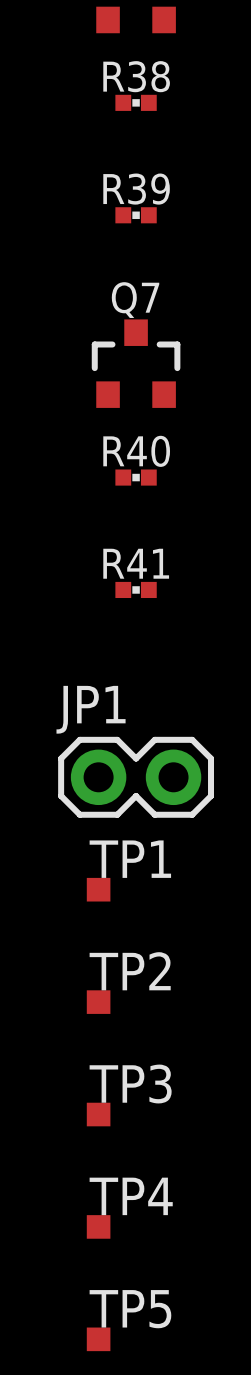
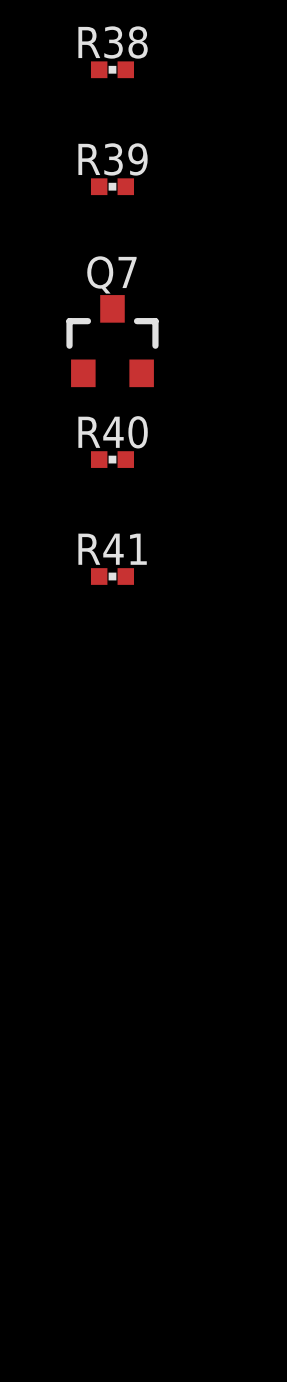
JP1: (136, 777) -> none
TP1: (98, 889) -> none
TP2: (98, 1002) -> none
TP3: (98, 1114) -> none
TP4: (98, 1226) -> none
TP5: (98, 1339) -> none

